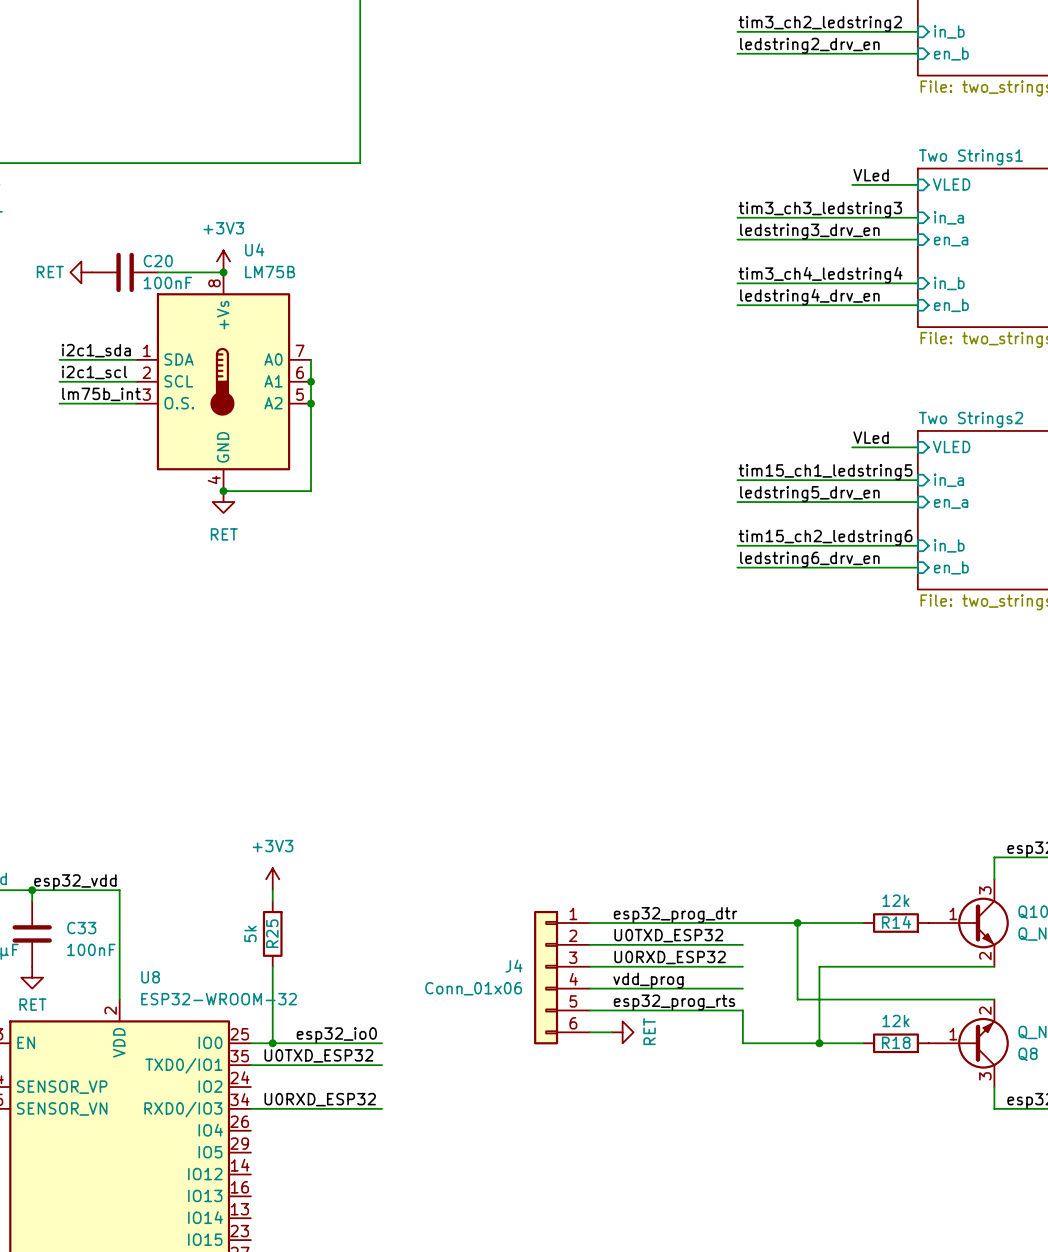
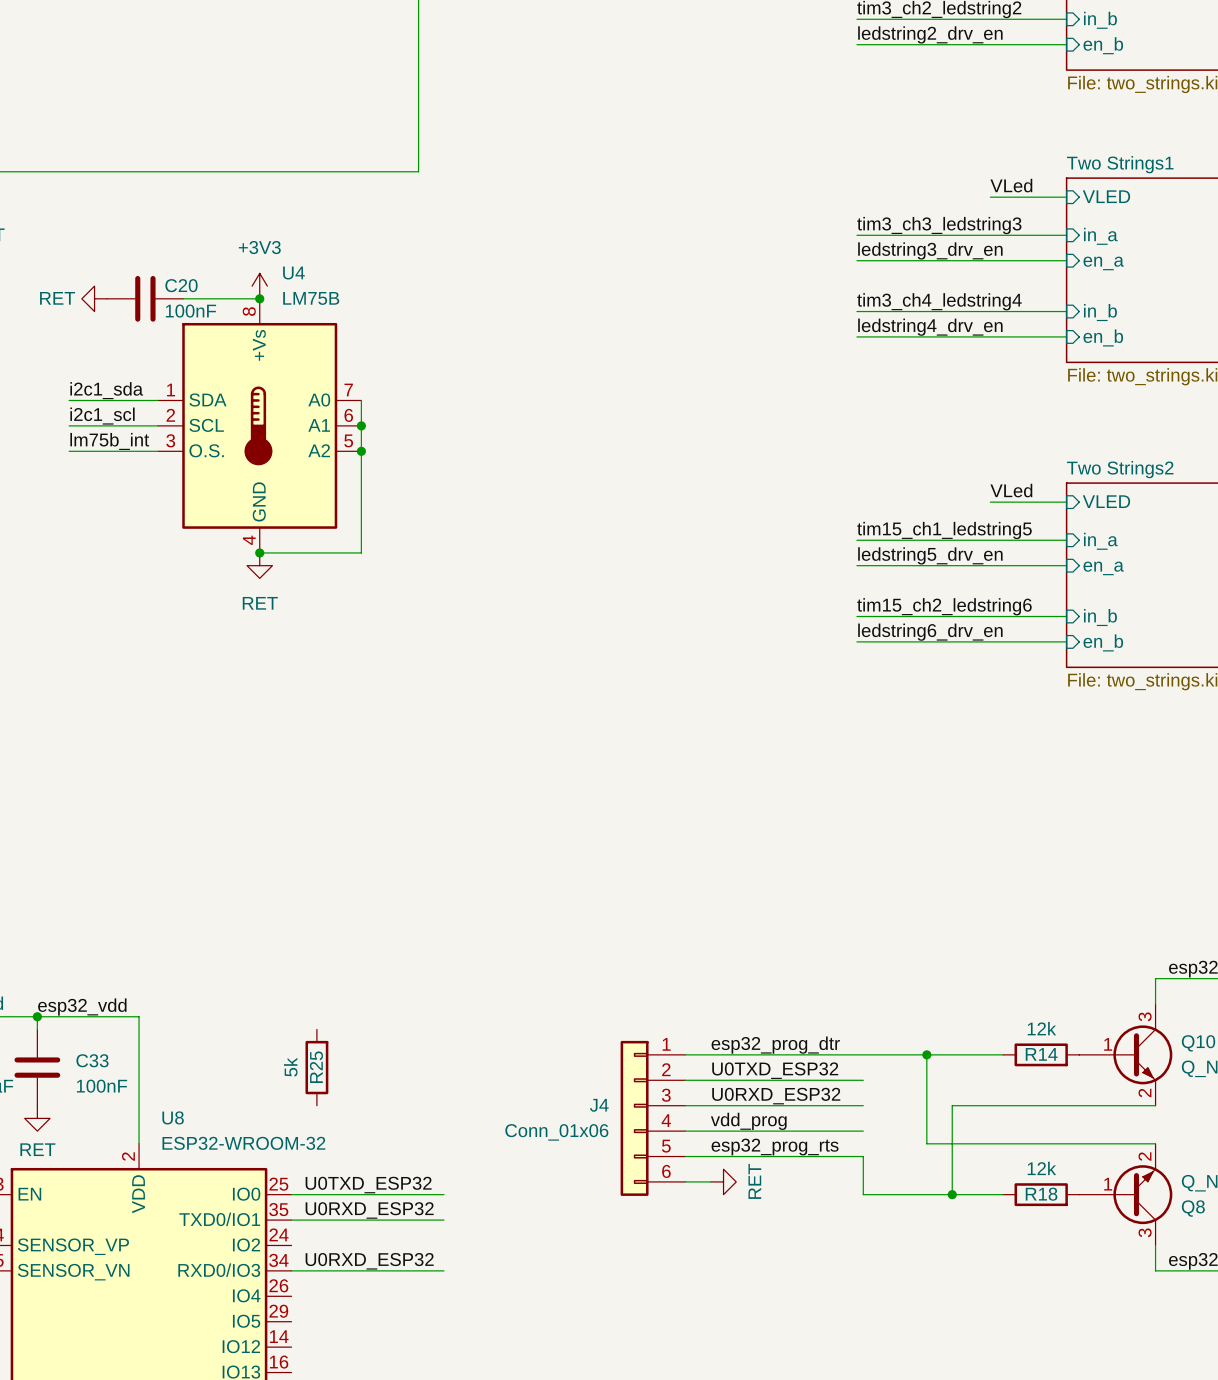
power symbol: +3V3 (272, 879) -> none
wire: (272, 890) (272, 901) -> none
wire: (272, 966) (272, 1043) -> none
label: none -> U0TXD_ESP32 (368, 1185)
label: esp32_io0 (336, 1035) -> none
junction: (272, 1043) -> none
label: U0TXD_ESP32 (318, 1055) -> U0RXD_ESP32 (369, 1210)

